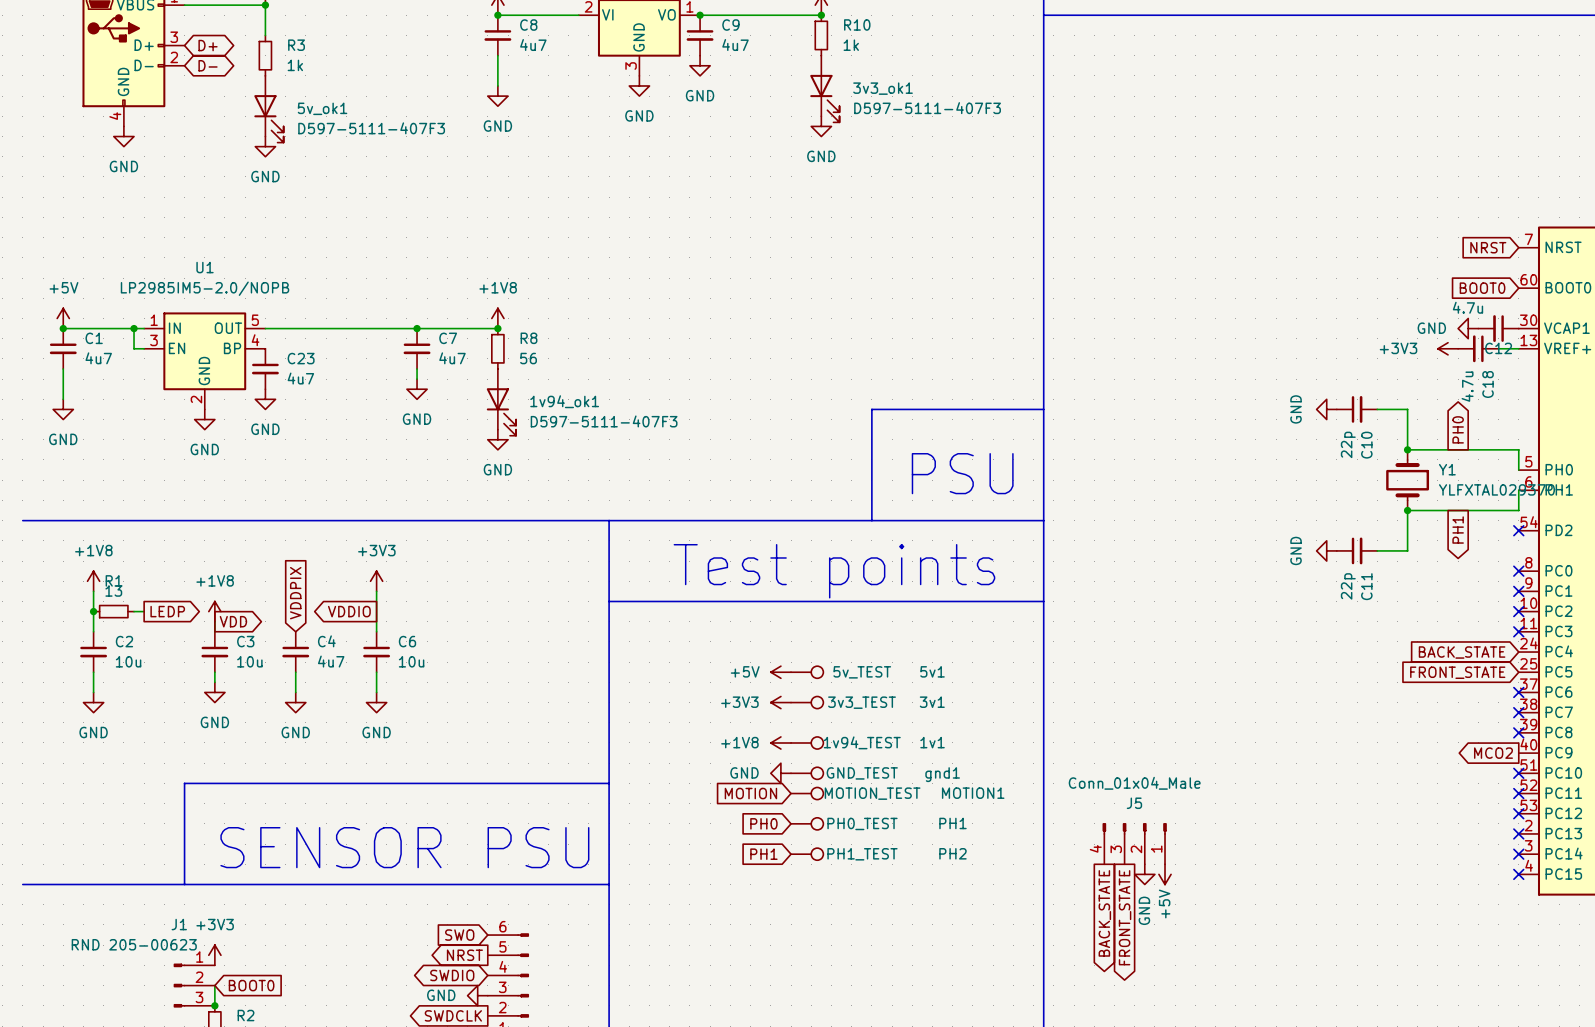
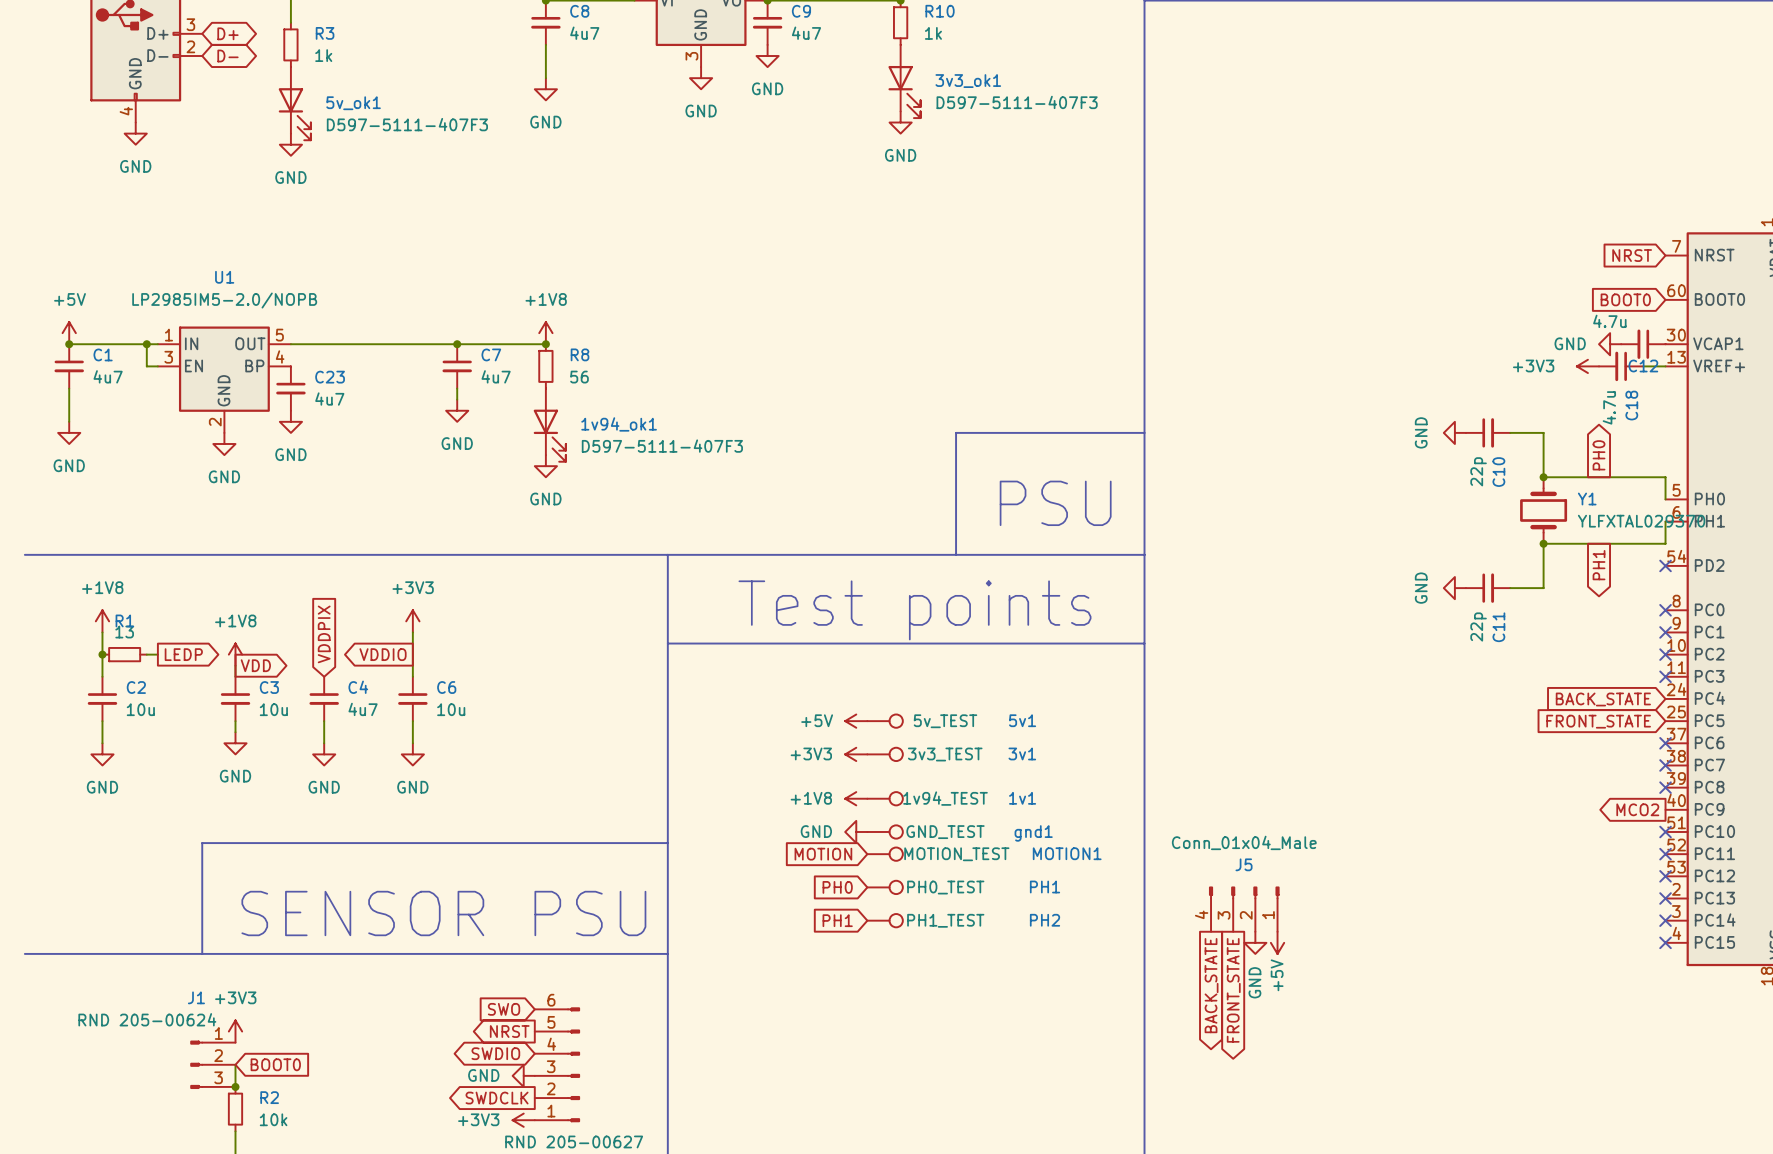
J1 value: RND 205-00623 (134, 944) -> RND 205-00624 (147, 1019)

